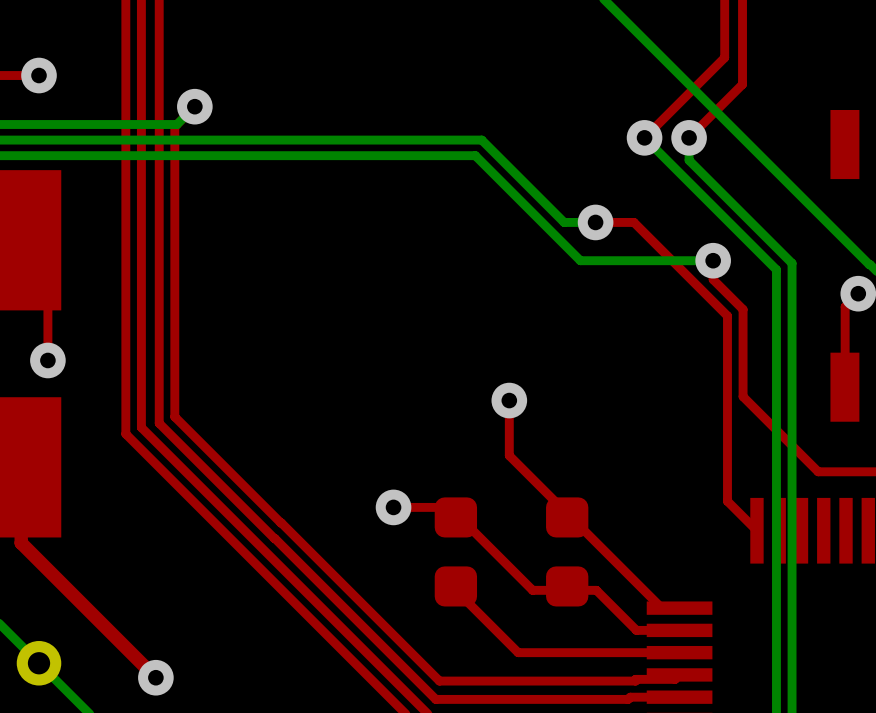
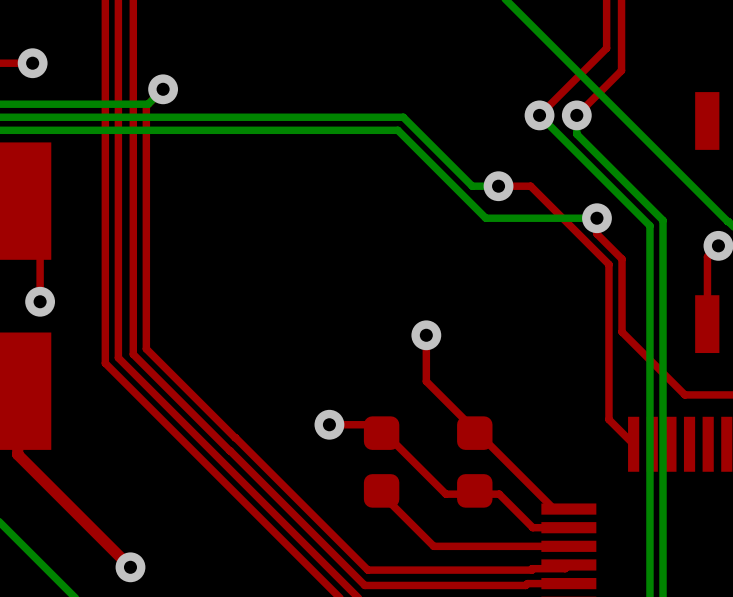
part: (39, 663) -> none

